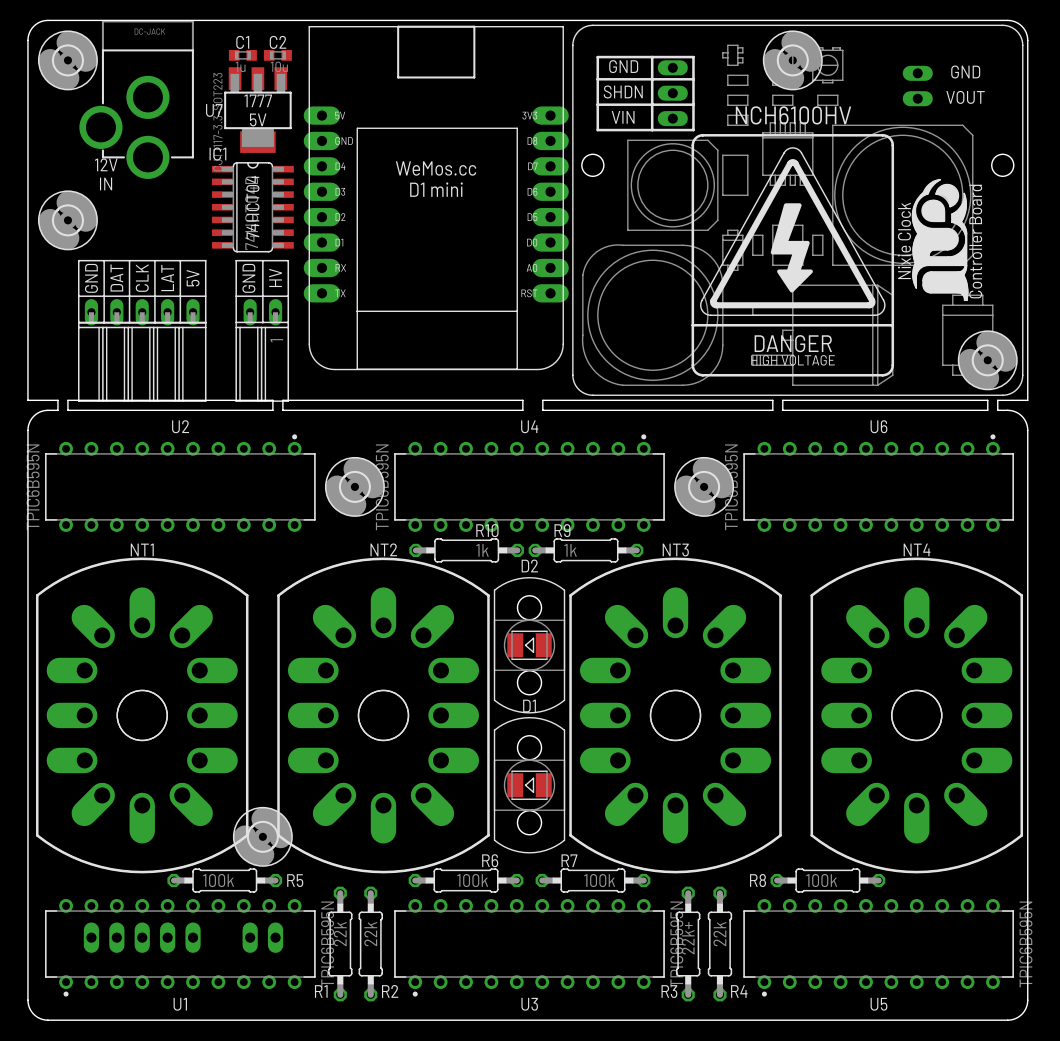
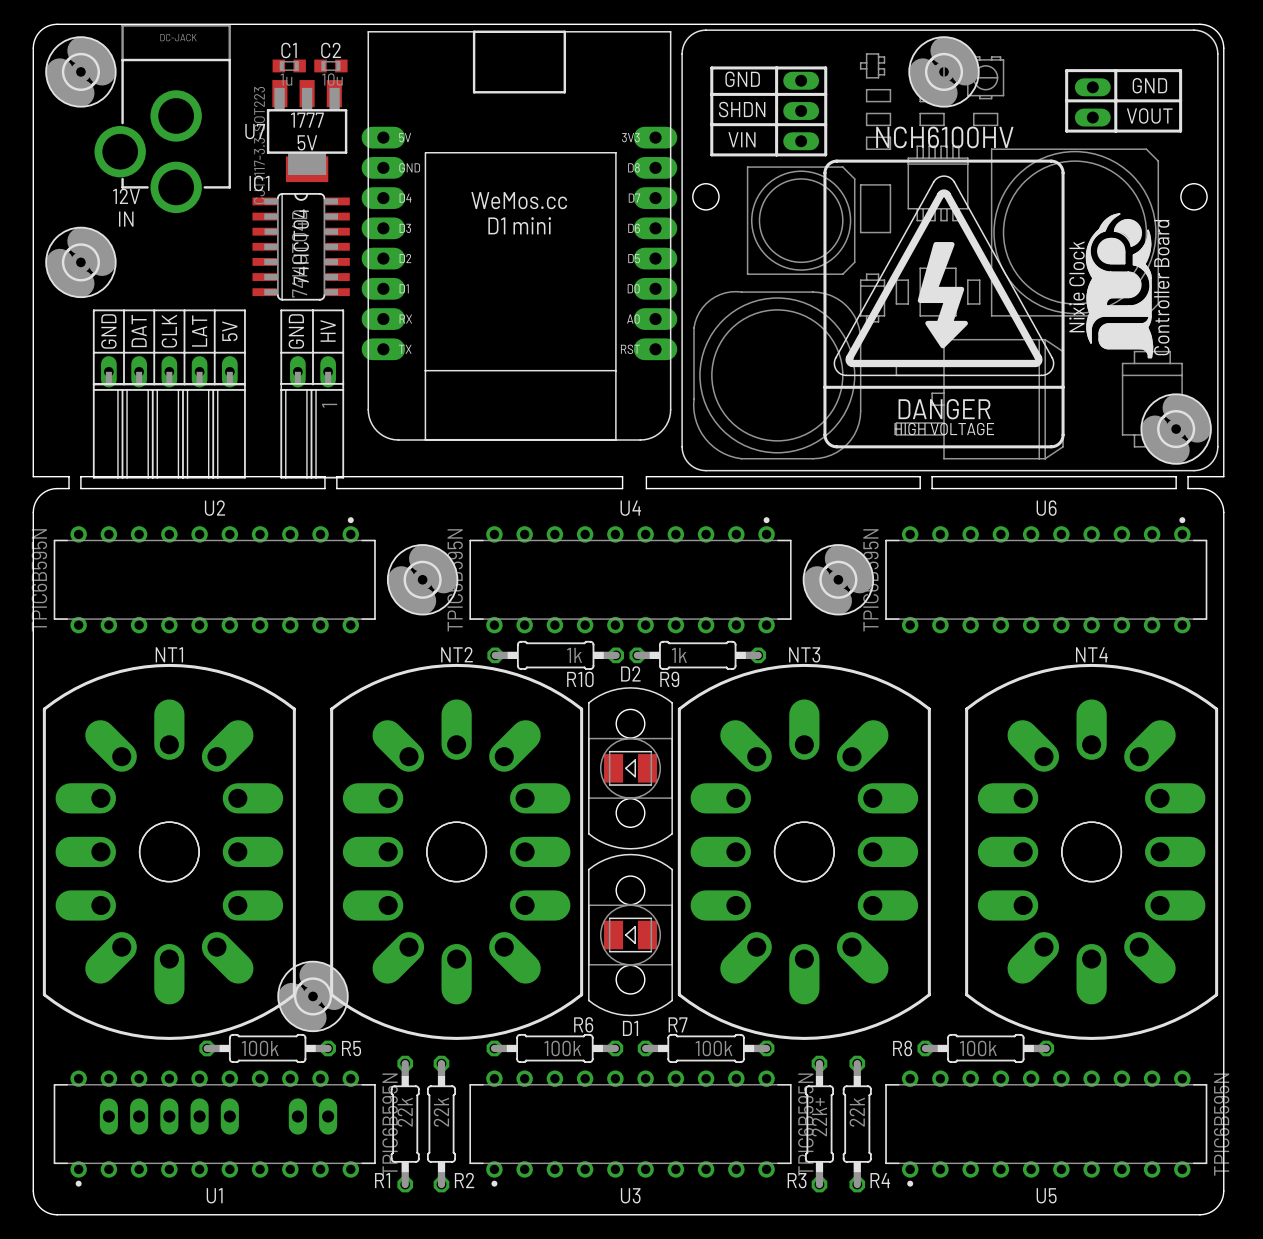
part footprint: [572, 24, 1024, 396] -> [681, 29, 1219, 472]
R10 name position: R10 (487, 530) -> R10 (580, 679)
R9 name position: R9 (562, 530) -> R9 (669, 679)
D1 name position: D1 (529, 706) -> D1 (630, 1028)

